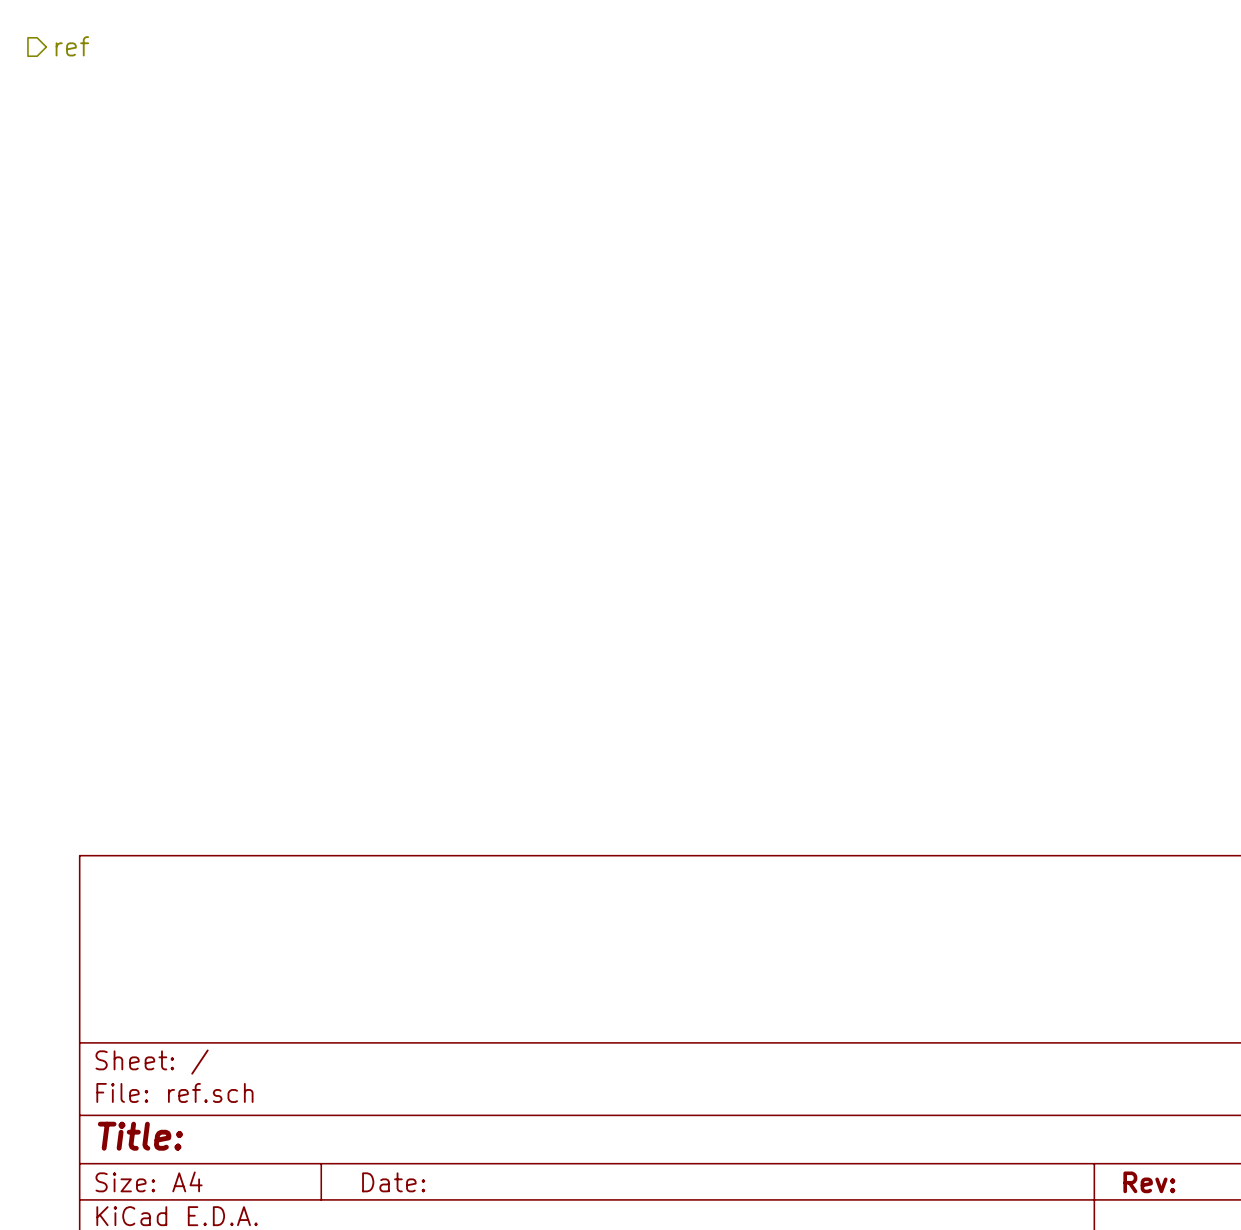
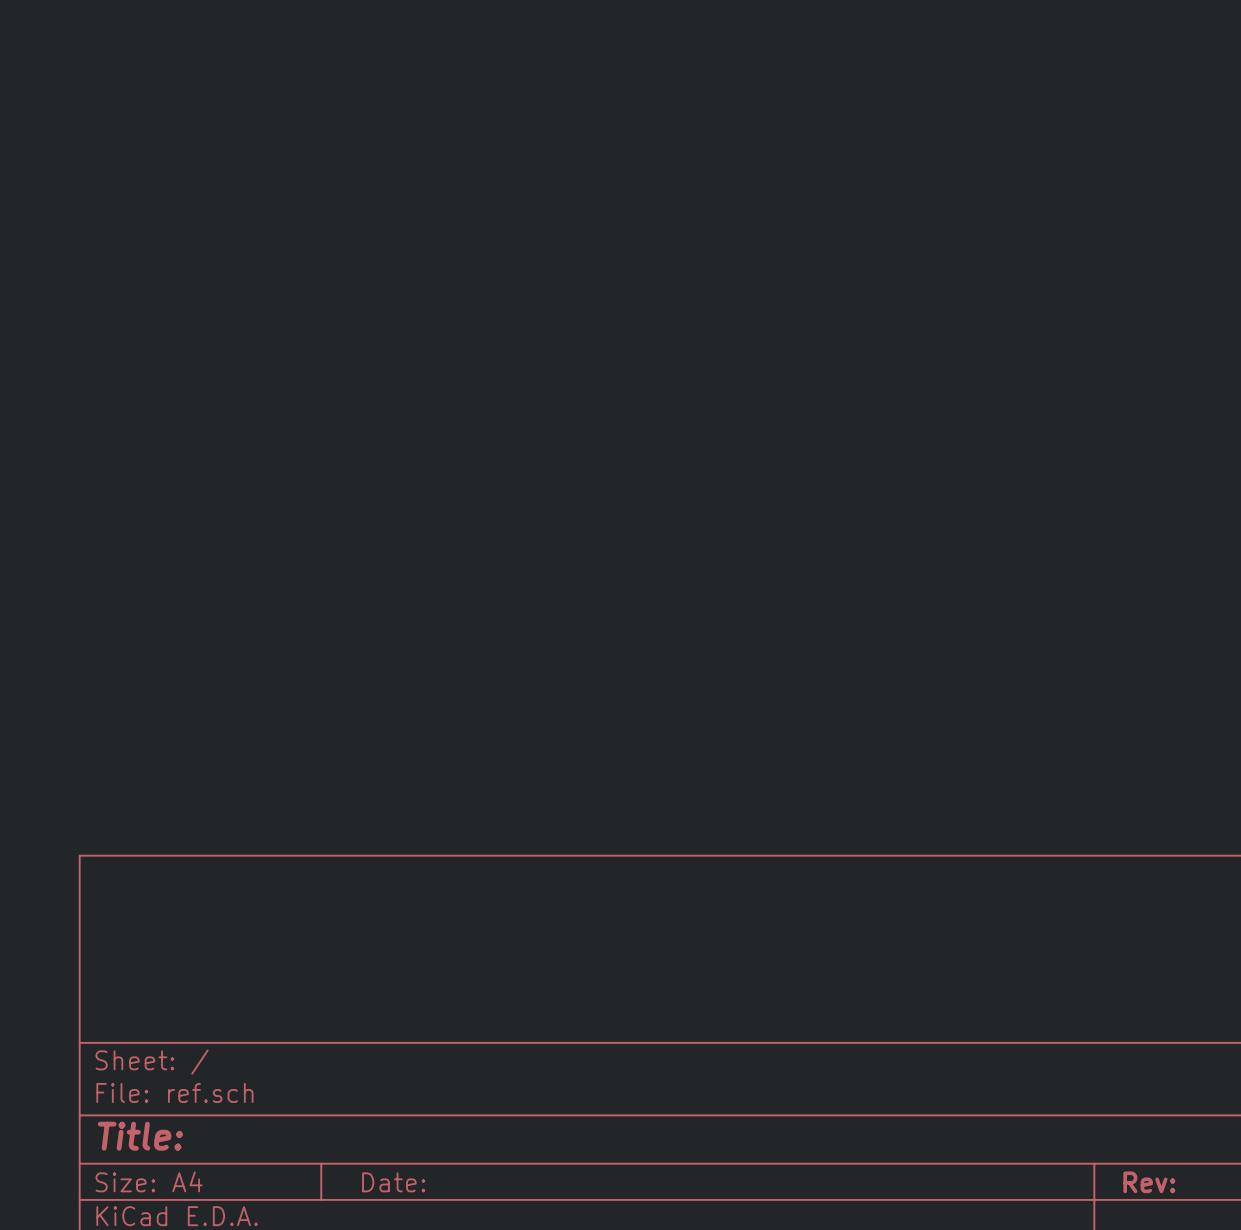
hierarchical label: ref (72, 46) -> none

